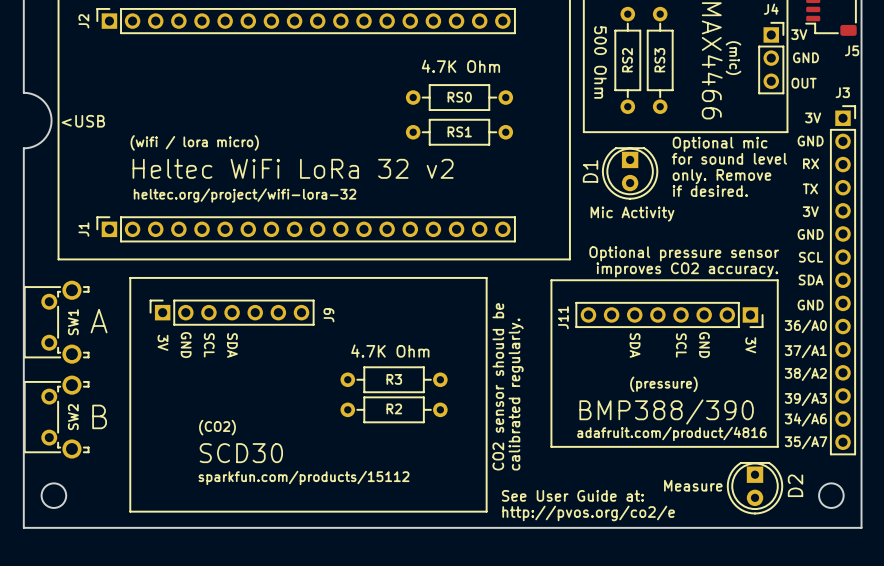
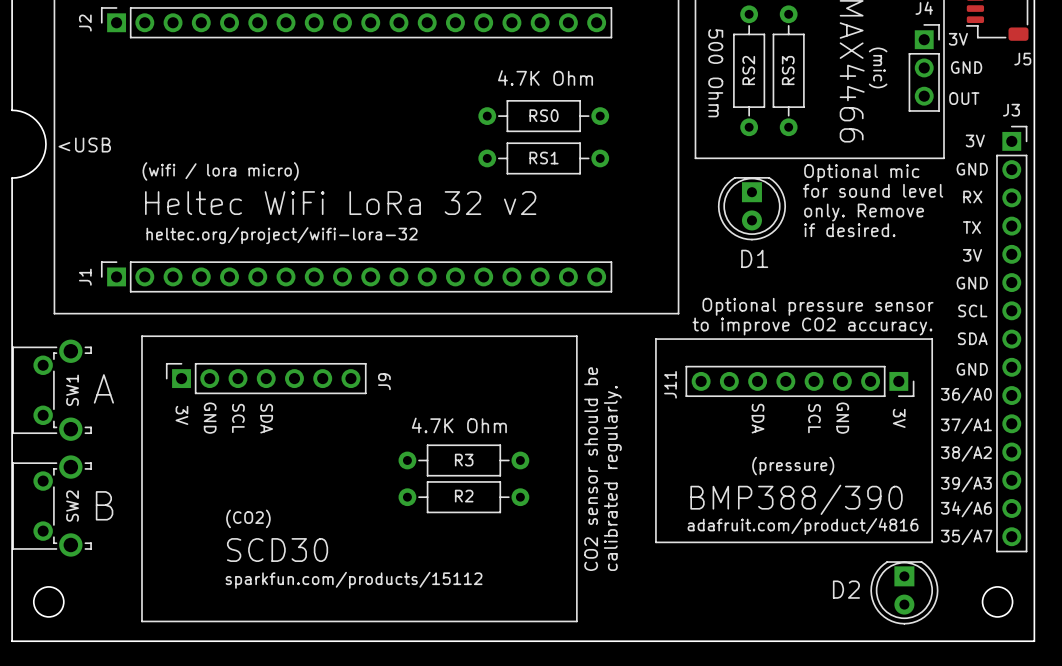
D1 name rotation: 0° (590, 171) -> 90° clockwise (754, 258)
D1 name position: D1 (590, 171) -> D1 (754, 258)
text: Mic Activity (632, 214) -> none
text: improves CO2 accuracy. (687, 269) -> to improve CO2 accuracy. (812, 326)
text: Measure (693, 485) -> none
D2 name rotation: 0° (795, 485) -> 90° clockwise (846, 589)
D2 name position: D2 (795, 485) -> D2 (846, 589)
text: See User Guide at: (572, 495) -> none
text: http://pvos.org/co2/e (588, 513) -> none

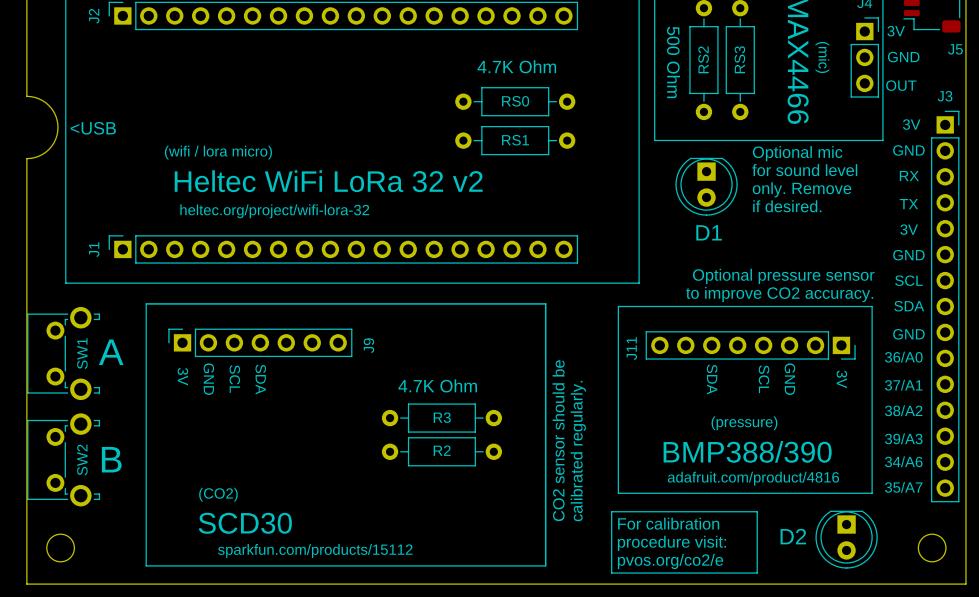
text position: (CO2) (248, 518) -> (CO2) (218, 494)
text position: SCD30 (277, 550) -> SCD30 (245, 523)
line: none -> (611, 511) (611, 573) (757, 573) (757, 511) (611, 511)
text: none -> For calibration (668, 523)
text position: sparkfun.com/products/15112 (354, 580) -> sparkfun.com/products/15112 (315, 550)
text: none -> procedure visit: (671, 543)
text: none -> pvos.org/co2/e (670, 561)

